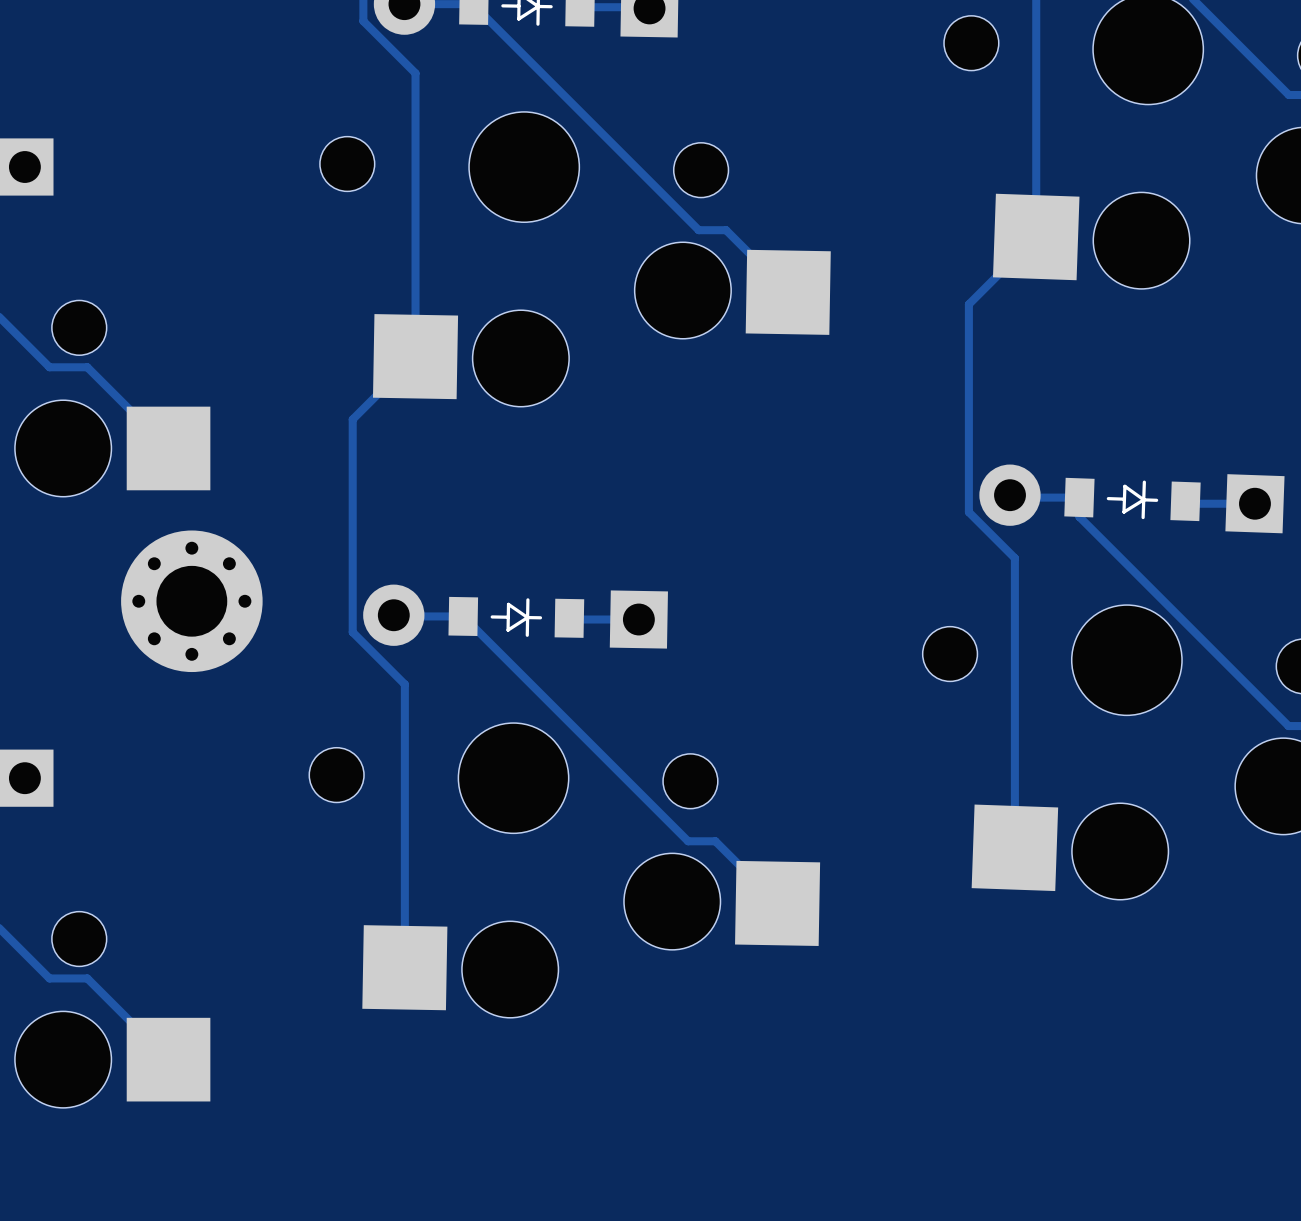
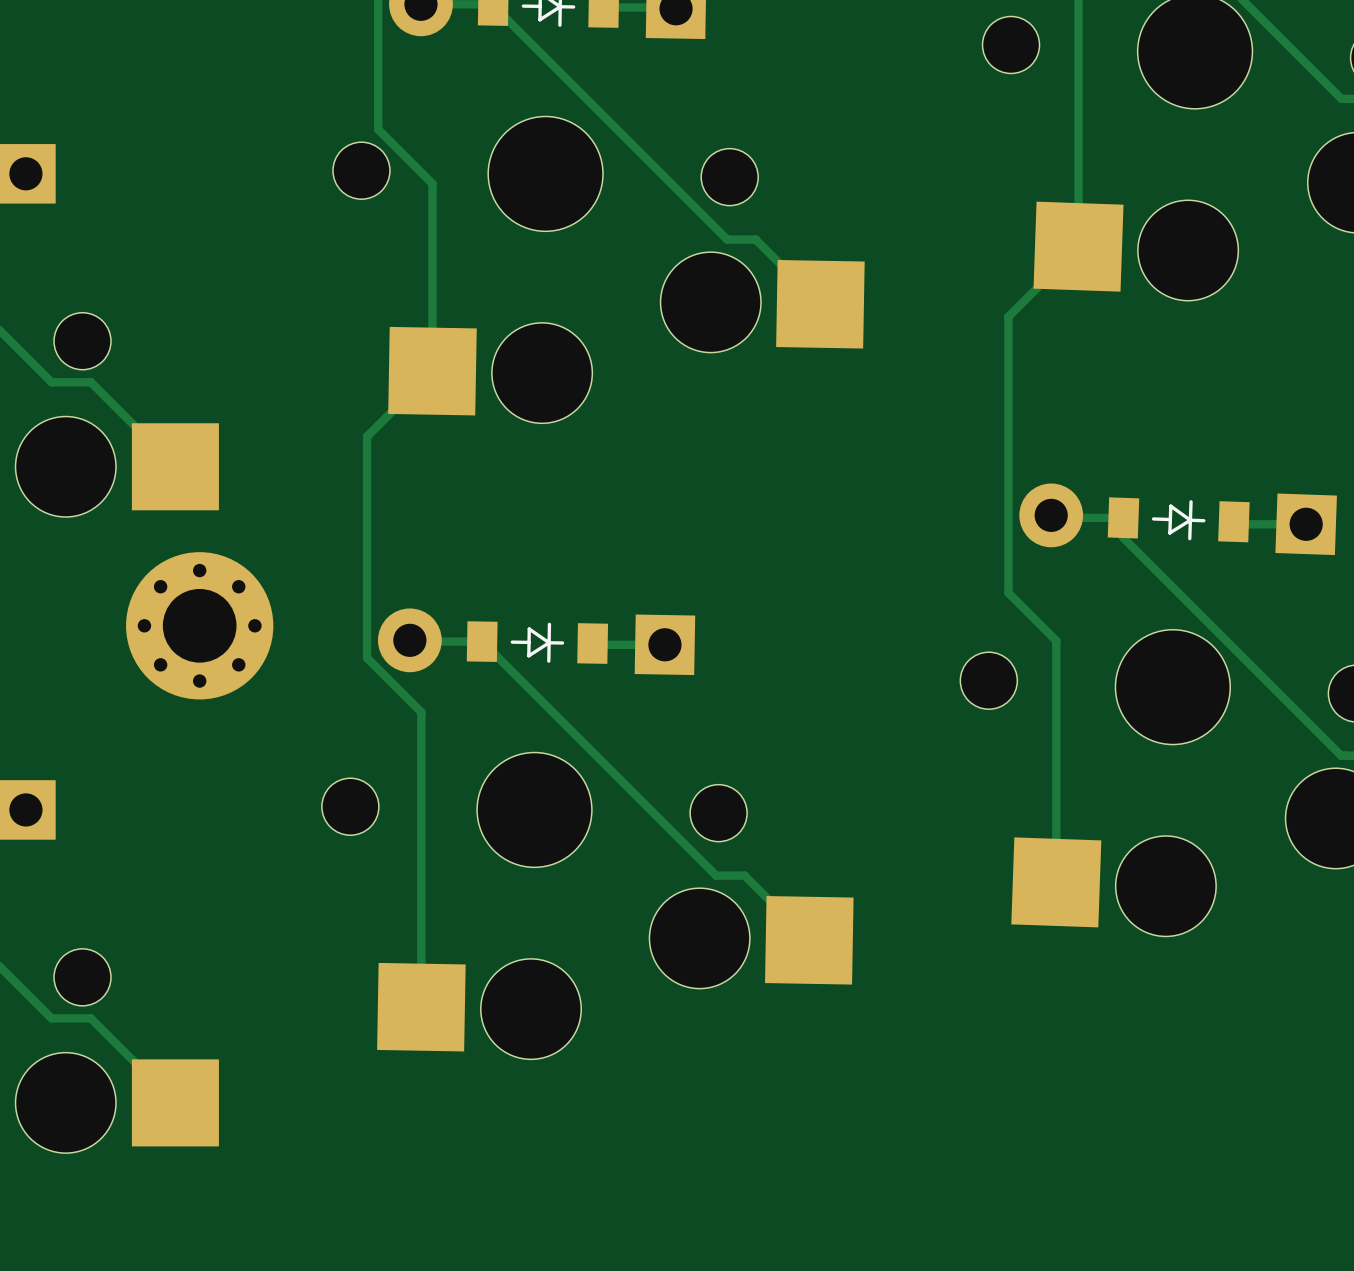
track: (363, 21) (415, 73) (415, 176) -> (378, 22) (378, 129) (432, 183)
track: (968, 512) (1014, 558) (1014, 615) -> (1008, 533) (1008, 592) (1056, 640)

